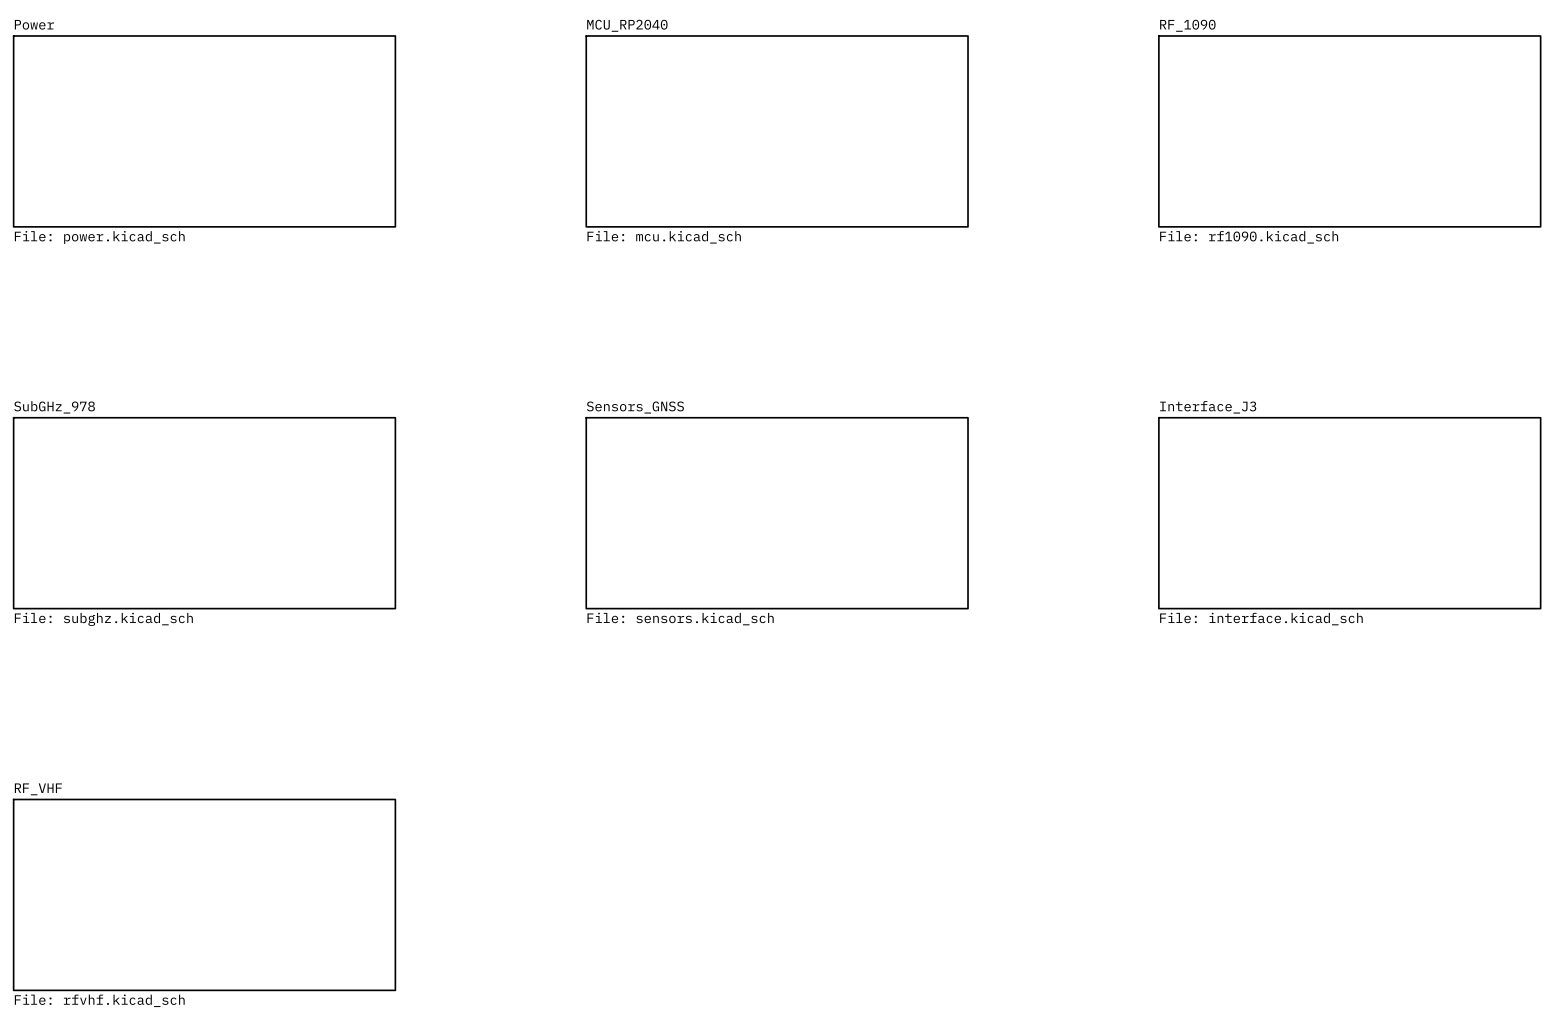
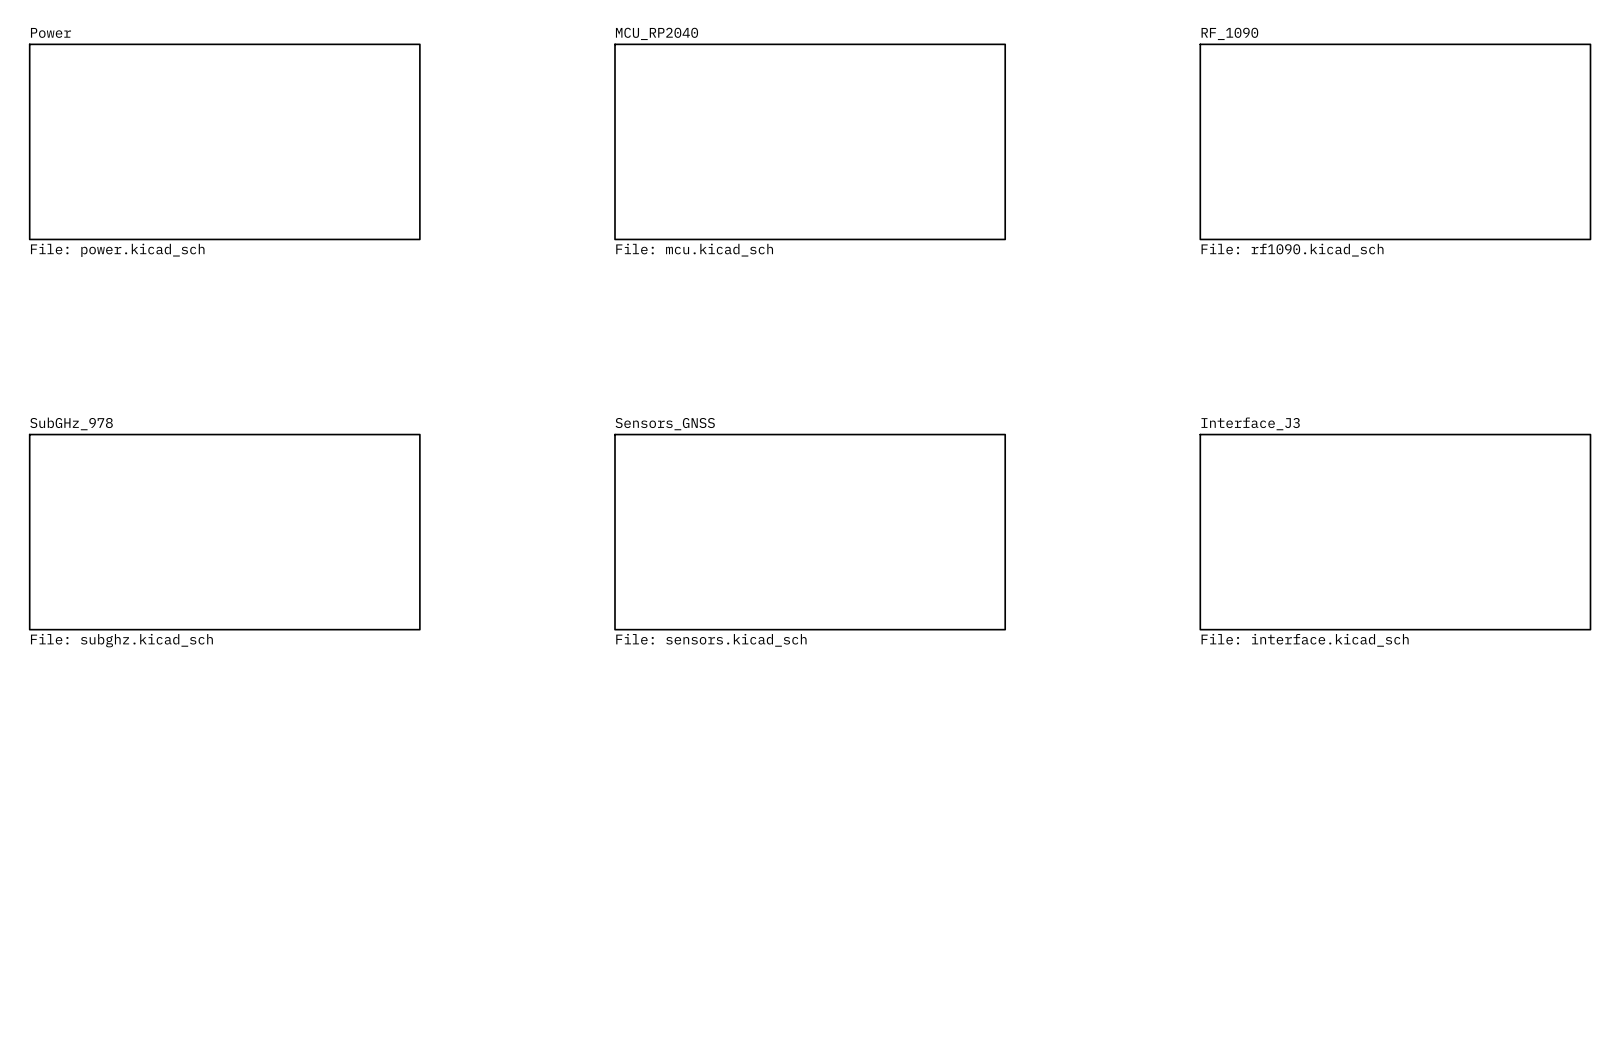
sheet RF_VHF: File: rfvhf.kicad_sch (204, 894) -> none

